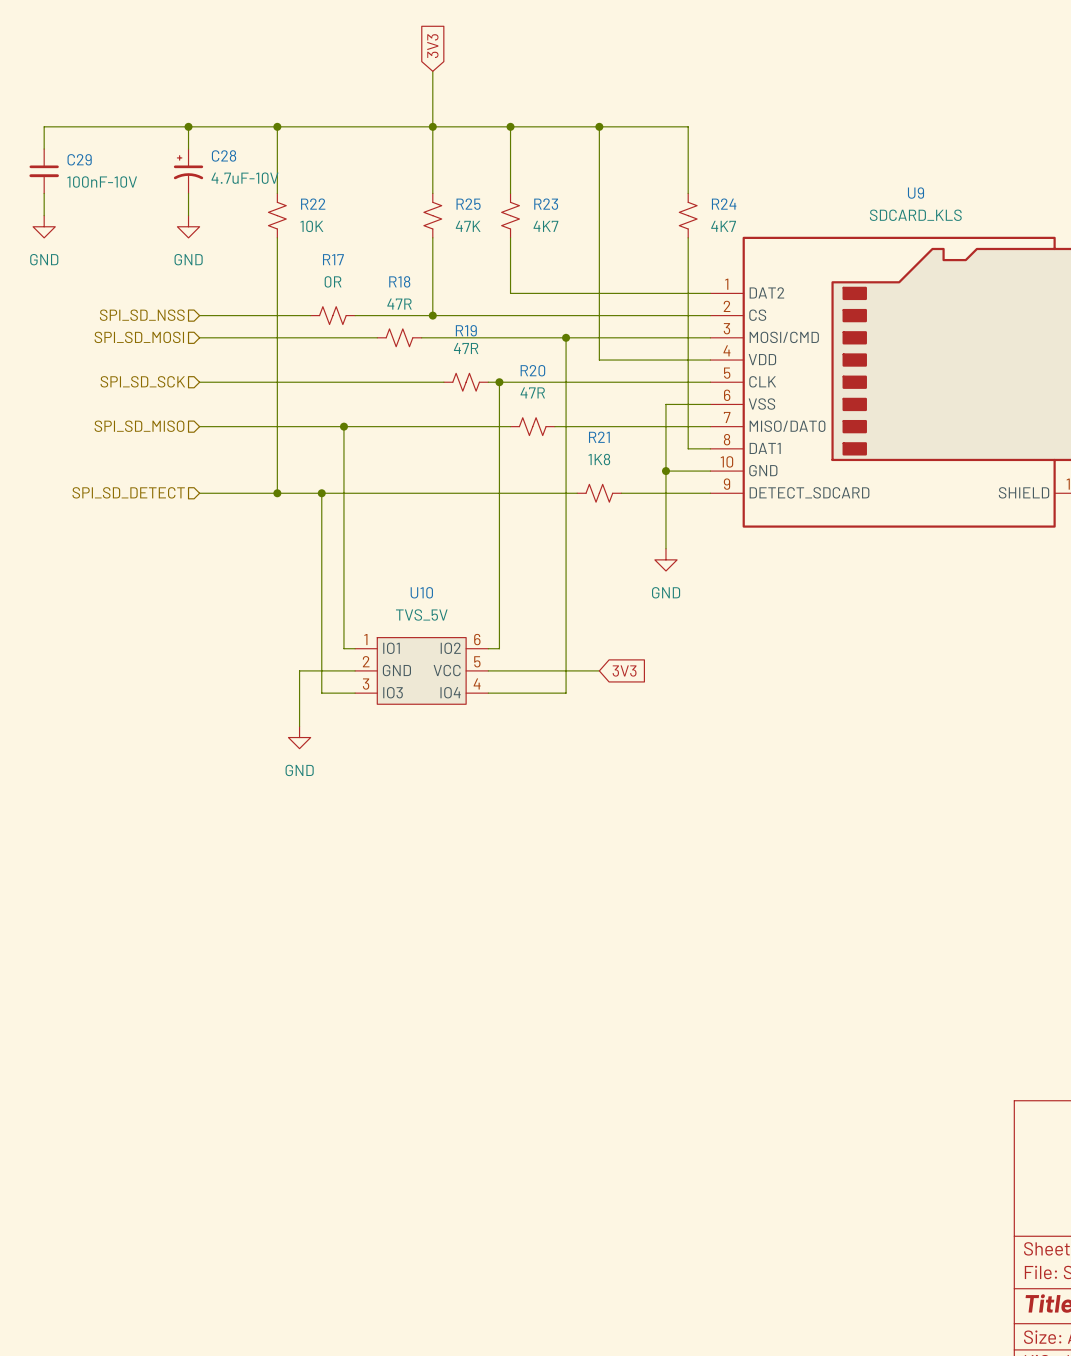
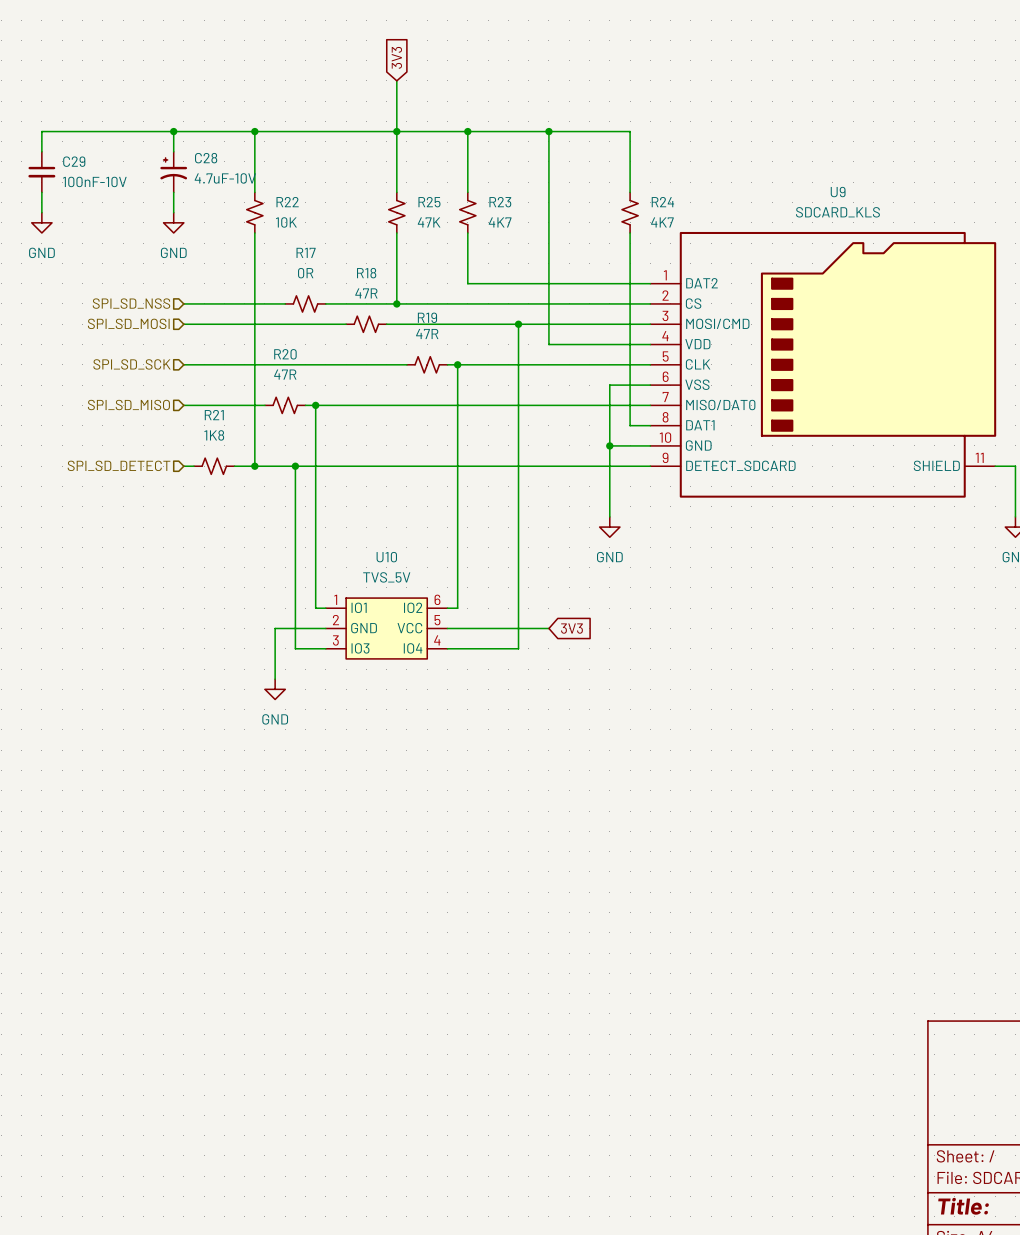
R20 position: (532, 426) -> (285, 405)
R21 position: (599, 493) -> (214, 466)

